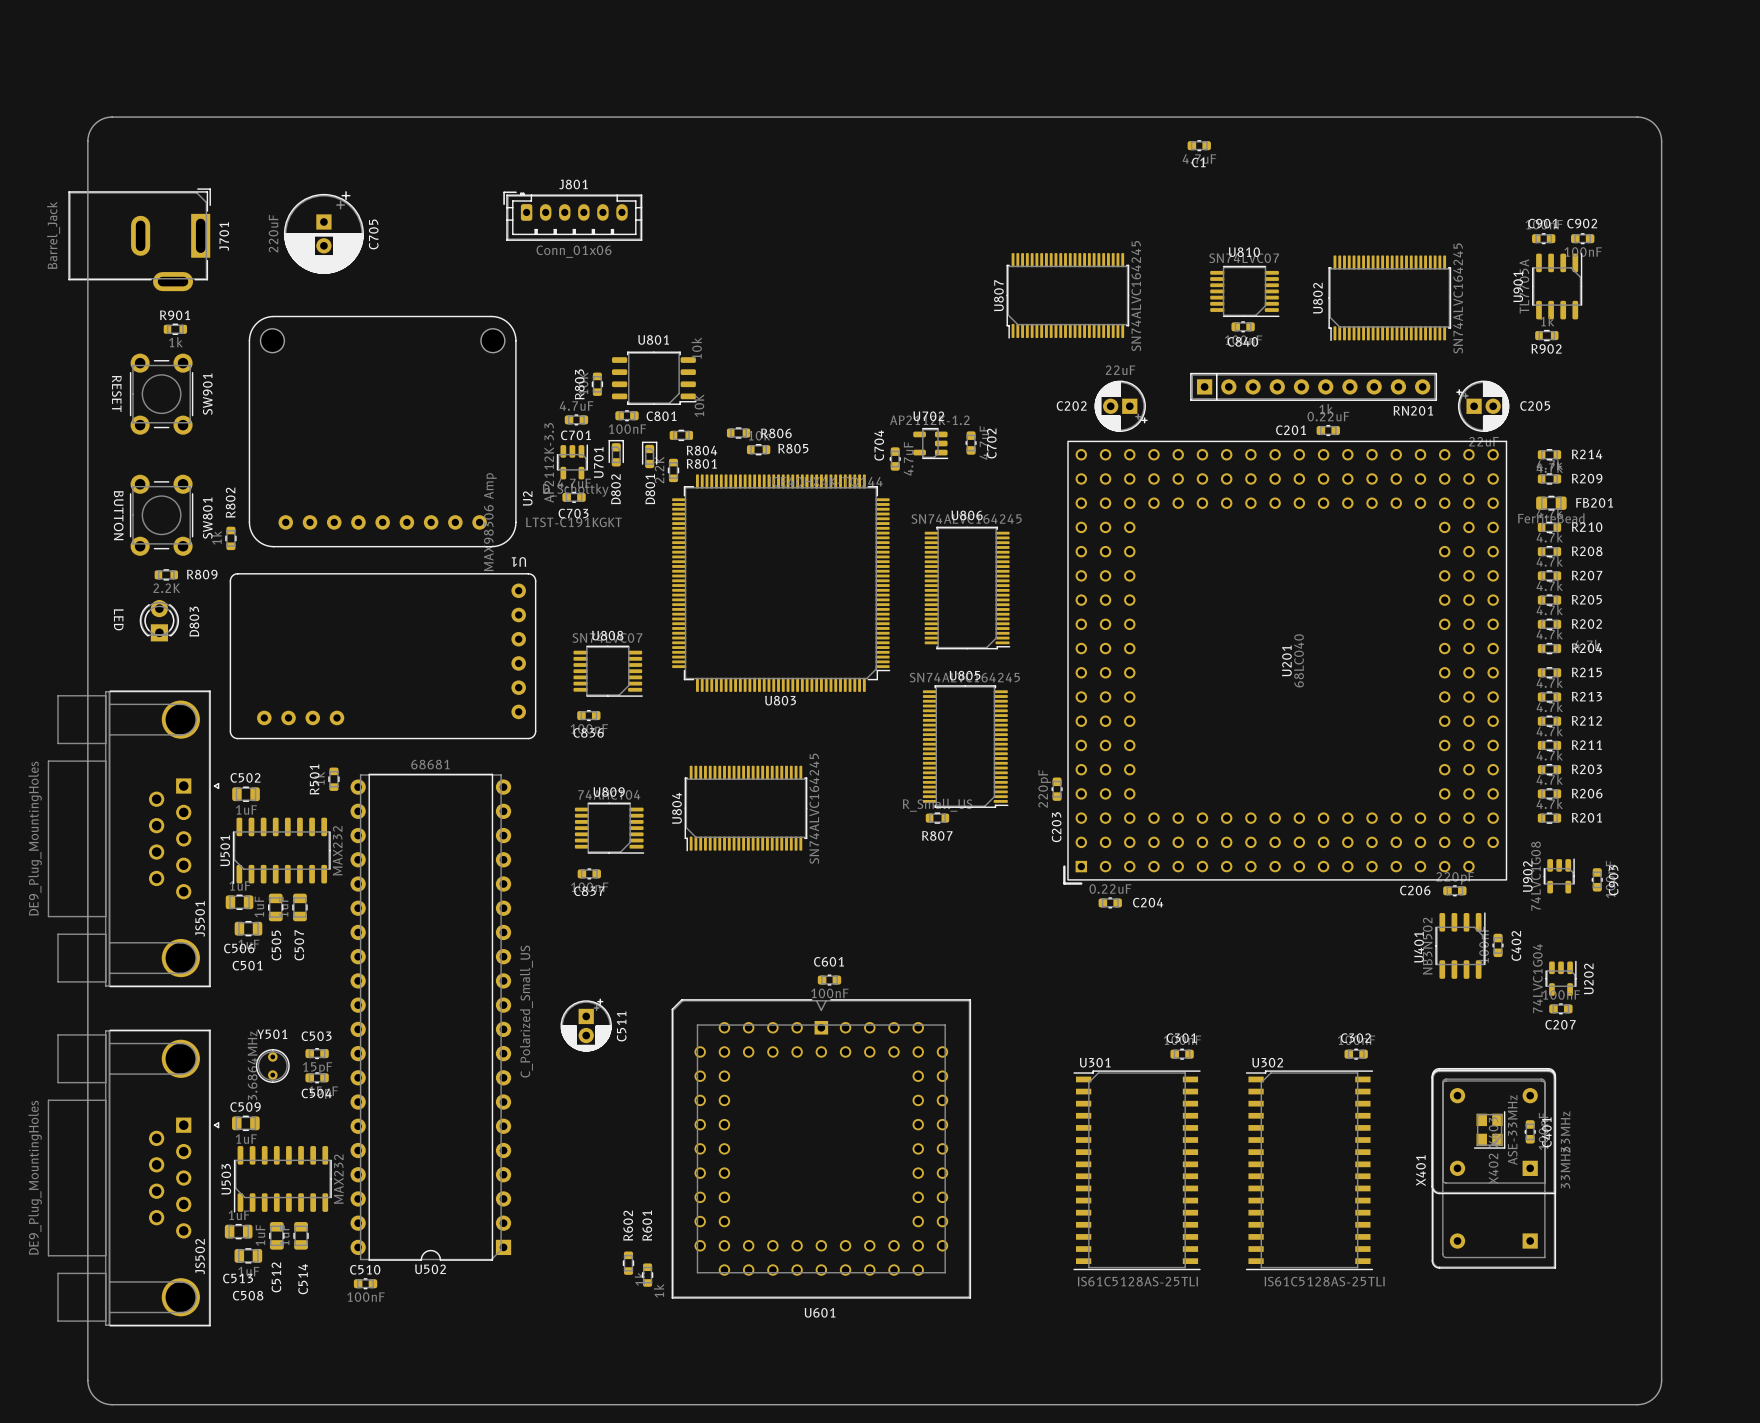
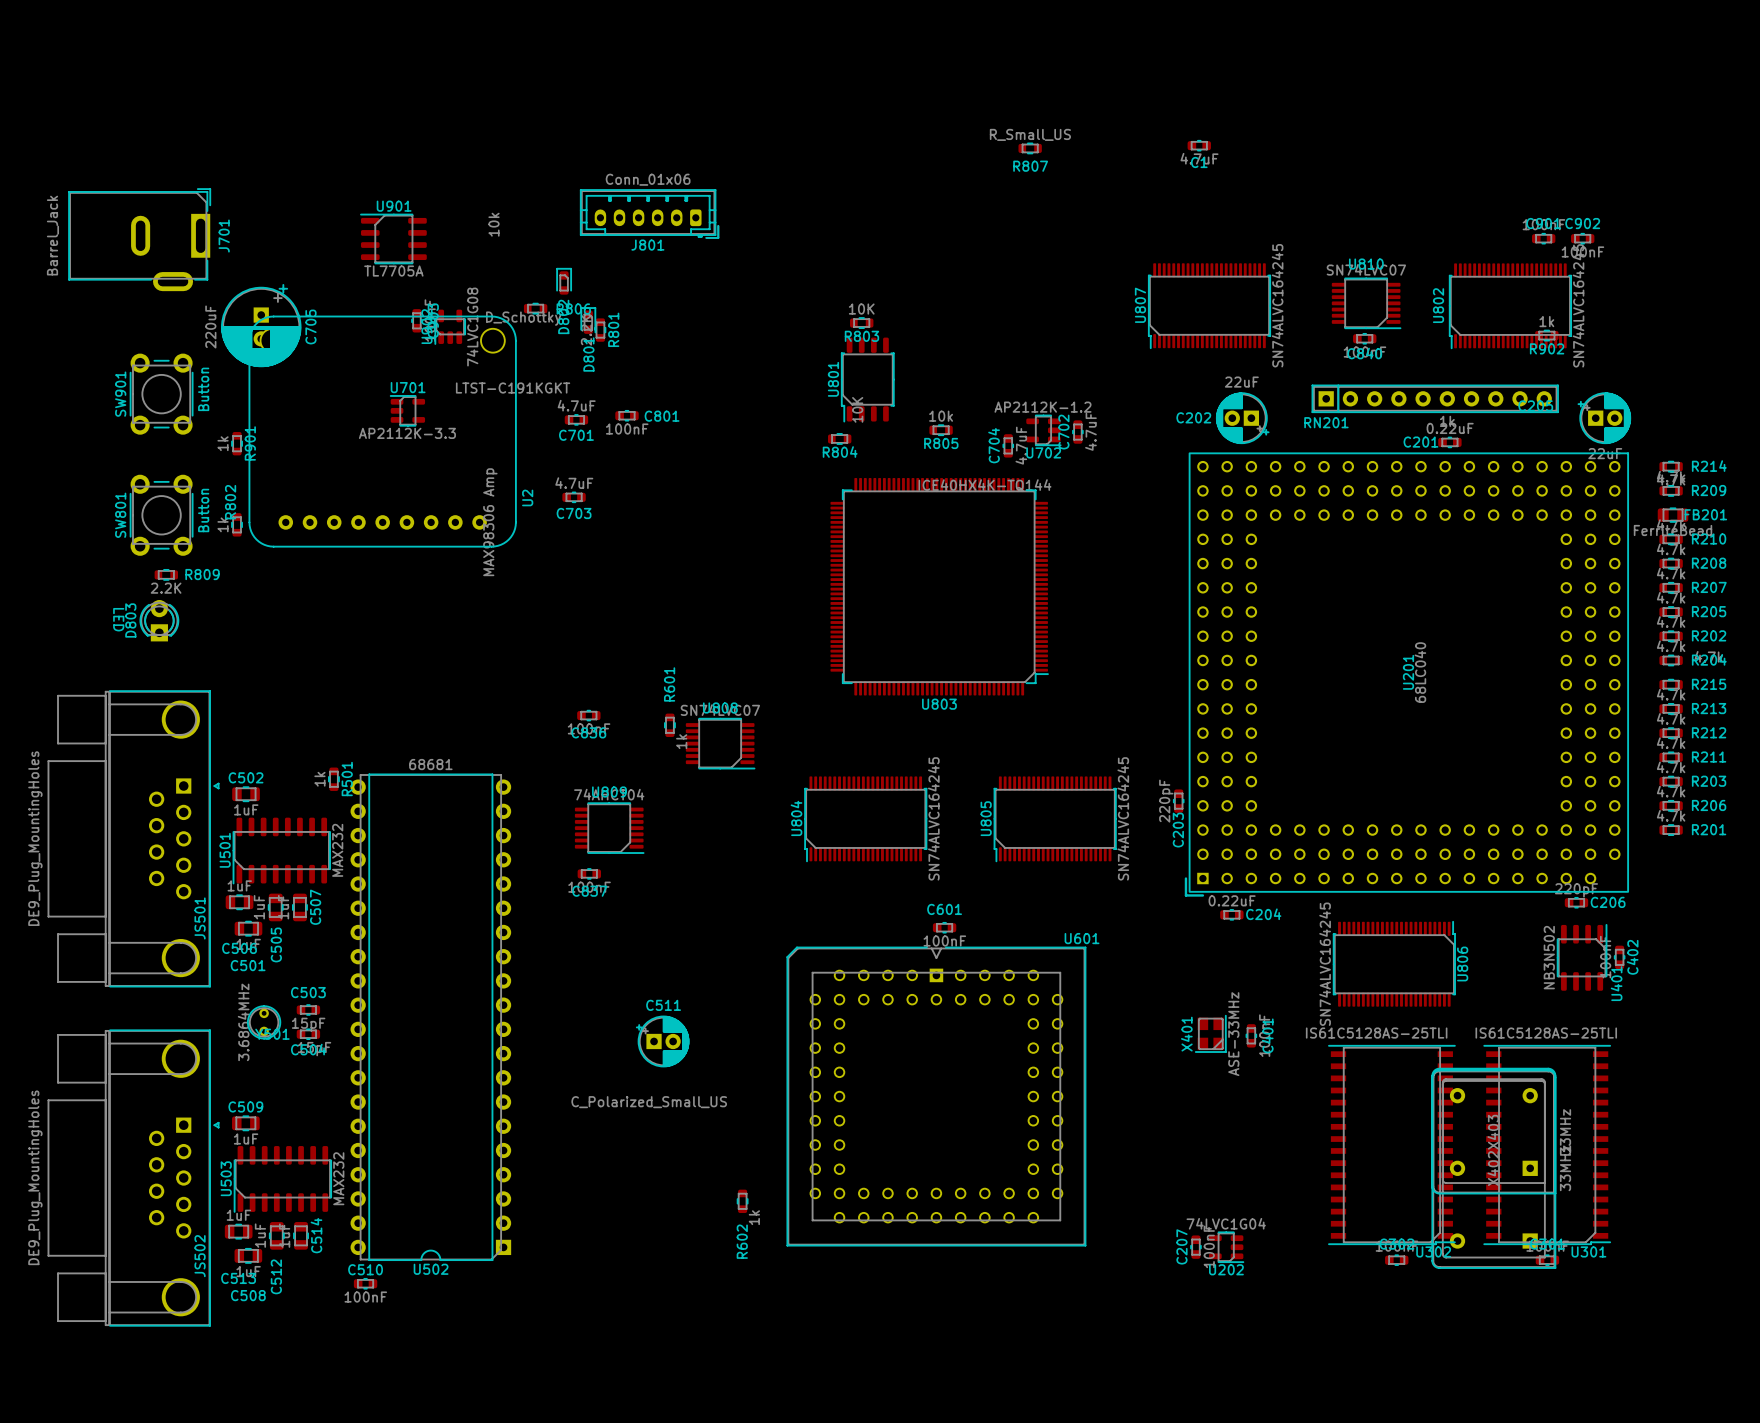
board edge: (112, 117) (1637, 117) (1652, 122) (1659, 132) (1661, 141) (1661, 1380) (1656, 1395) (1649, 1401) (1637, 1404) (112, 1404) (97, 1399) (89, 1389) (87, 1380) (87, 141) (89, 132) (94, 124) (102, 118) (112, 117) -> none
J801 rotation: 0° (572, 216) -> 180° (649, 213)
C705 position: (323, 232) -> (261, 325)
U901 name position: U901 (1518, 286) -> U901 (394, 206)
U901 rotation: 0° (1557, 286) -> 90° counterclockwise (393, 238)
U901 position: (1557, 286) -> (393, 238)
U810 position: (1244, 291) -> (1366, 303)
U807 position: (1067, 295) -> (1209, 306)
U802 position: (1389, 298) -> (1510, 306)
C840 position: (1243, 326) -> (1364, 338)
R901 rotation: 0° (175, 329) -> 90° clockwise (237, 443)
R901 position: (175, 329) -> (237, 443)
U801 name position: U801 (653, 339) -> U801 (833, 379)
U801 rotation: 0° (654, 378) -> 90° clockwise (867, 379)
U801 position: (654, 378) -> (867, 379)
R803 name position: R803 (579, 384) -> R803 (861, 336)
R803 rotation: 0° (597, 384) -> 90° clockwise (861, 323)
R803 position: (597, 384) -> (861, 323)
RN201 position: (1313, 386) -> (1435, 398)
SW901 value: RESET (116, 393) -> Button (203, 389)
SW901 name position: SW901 (207, 394) -> SW901 (120, 394)
C202 position: (1121, 406) -> (1242, 418)
C205 position: (1482, 406) -> (1604, 418)
RN201 name position: RN201 (1413, 410) -> RN201 (1326, 422)
U702 name position: U702 (928, 416) -> U702 (1043, 452)
C201 name position: C201 (1291, 430) -> C201 (1420, 442)
C201 position: (1328, 430) -> (1449, 442)
R806 position: (738, 433) -> (535, 308)
R804 position: (681, 435) -> (839, 438)
U702 position: (930, 443) -> (1043, 430)
C702 position: (971, 443) -> (1077, 432)
C702 name position: C702 (991, 443) -> C702 (1063, 432)
C704 name position: C704 (879, 445) -> C704 (994, 445)
R805 name position: R805 (793, 448) -> R805 (941, 443)
R805 position: (758, 449) -> (941, 430)
R804 name position: R804 (701, 450) -> R804 (840, 452)
D802 position: (616, 453) -> (564, 281)
D801 position: (649, 454) -> (588, 320)
R214 position: (1549, 454) -> (1671, 466)
C704 position: (895, 459) -> (1008, 445)
U701 rotation: 0° (572, 461) -> 90° counterclockwise (407, 410)
U701 position: (572, 461) -> (407, 410)
R801 name rotation: 0° (701, 463) -> 90° counterclockwise (613, 329)
R801 position: (673, 470) -> (600, 330)
R209 position: (1549, 478) -> (1671, 490)
FB201 name position: FB201 (1594, 502) -> FB201 (1705, 514)
FB201 position: (1551, 503) -> (1673, 515)
SW801 value: BUTTON (118, 515) -> Button (203, 510)
U806 name position: U806 (967, 515) -> U806 (1462, 964)
SW801 name position: SW801 (207, 518) -> SW801 (120, 515)
R210 position: (1549, 527) -> (1671, 539)
R802 position: (230, 538) -> (237, 524)
R208 position: (1549, 551) -> (1671, 563)
R207 position: (1549, 575) -> (1671, 587)
U803 position: (781, 583) -> (939, 586)
U806 rotation: 0° (967, 588) -> 90° counterclockwise (1394, 963)
U806 position: (967, 588) -> (1394, 963)
R205 position: (1549, 600) -> (1671, 612)
D803 name position: D803 (194, 621) -> D803 (130, 620)
R202 position: (1549, 624) -> (1671, 636)
R204 position: (1549, 648) -> (1671, 660)
U1: (383, 656) -> none
U201 position: (1285, 662) -> (1406, 674)
U808 position: (608, 671) -> (720, 743)
R215 position: (1549, 672) -> (1671, 684)
U805 name position: U805 (965, 675) -> U805 (986, 818)
R213 position: (1549, 697) -> (1671, 708)
R212 position: (1549, 721) -> (1671, 733)
R211 position: (1549, 745) -> (1671, 757)
U805 rotation: 0° (965, 746) -> 90° clockwise (1055, 819)
U805 position: (965, 746) -> (1055, 819)
R203 position: (1549, 769) -> (1671, 781)
R501 name position: R501 (314, 779) -> R501 (347, 779)
C203 position: (1057, 789) -> (1178, 801)
R206 position: (1549, 793) -> (1671, 805)
U804 position: (745, 808) -> (865, 819)
R807 position: (937, 818) -> (1030, 148)
R201 position: (1549, 818) -> (1671, 830)
C203 name position: C203 (1056, 827) -> C203 (1178, 830)
U902 rotation: 0° (1559, 875) -> 180° (450, 327)
U902 position: (1559, 875) -> (450, 327)
C903 position: (1597, 879) -> (416, 320)
C206 name position: C206 (1415, 890) -> C206 (1608, 902)
C206 position: (1454, 890) -> (1576, 902)
C204 position: (1110, 902) -> (1231, 914)
C204 name position: C204 (1148, 902) -> C204 (1263, 914)
C507 name position: C507 (299, 945) -> C507 (315, 907)
U401 position: (1460, 945) -> (1582, 957)
C402 position: (1498, 945) -> (1619, 957)
C402 name position: C402 (1516, 945) -> C402 (1632, 957)
U401 name position: U401 (1419, 947) -> U401 (1616, 983)
U202 rotation: 0° (1561, 978) -> 90° clockwise (1226, 1247)
U202 position: (1561, 978) -> (1226, 1247)
C601 position: (829, 980) -> (944, 927)
C207 rotation: 0° (1560, 1008) -> 90° clockwise (1195, 1247)
C207 position: (1560, 1008) -> (1195, 1247)
C511 rotation: 0° (586, 1025) -> 90° counterclockwise (662, 1041)
C511 position: (586, 1025) -> (662, 1041)
C503 position: (317, 1053) -> (308, 1009)
C301 position: (1182, 1054) -> (1547, 1260)
C302 position: (1356, 1054) -> (1396, 1260)
Y501 position: (272, 1066) -> (264, 1022)
C504 position: (317, 1077) -> (308, 1034)
X401 position: (1489, 1129) -> (1210, 1033)
C401 position: (1530, 1131) -> (1251, 1035)
U601 position: (821, 1148) -> (936, 1096)
U301 rotation: 0° (1137, 1170) -> 180° (1547, 1145)
U301 position: (1137, 1170) -> (1547, 1145)
U302 rotation: 0° (1309, 1170) -> 180° (1391, 1145)
X401 name position: X401 (1420, 1170) -> X401 (1186, 1034)
R602 name position: R602 (628, 1225) -> R602 (742, 1241)
R601 name position: R601 (647, 1225) -> R601 (669, 684)
R602 position: (628, 1263) -> (742, 1201)
R601 position: (647, 1275) -> (669, 725)
C514 name position: C514 (303, 1279) -> C514 (316, 1235)
U601 name position: U601 (820, 1312) -> U601 (1082, 938)

